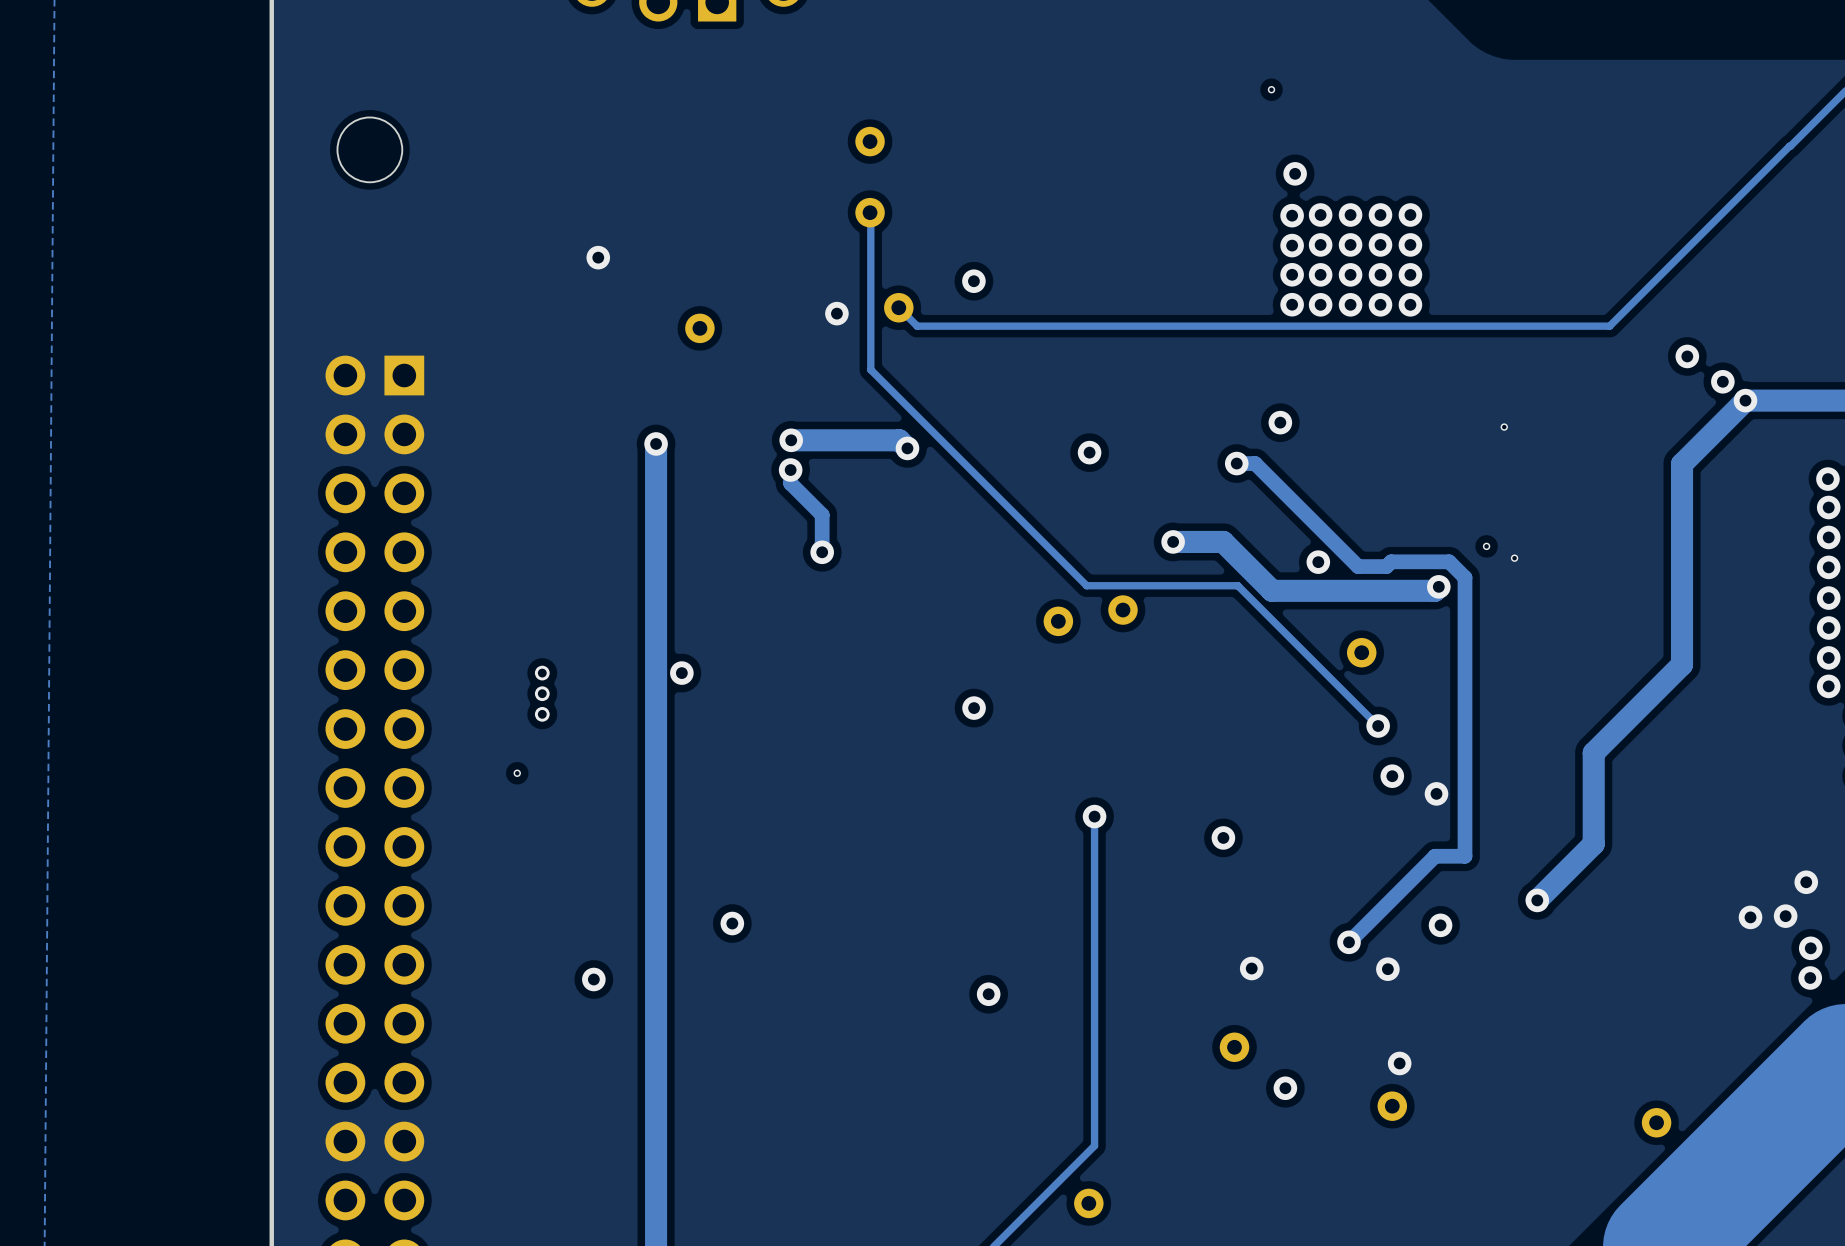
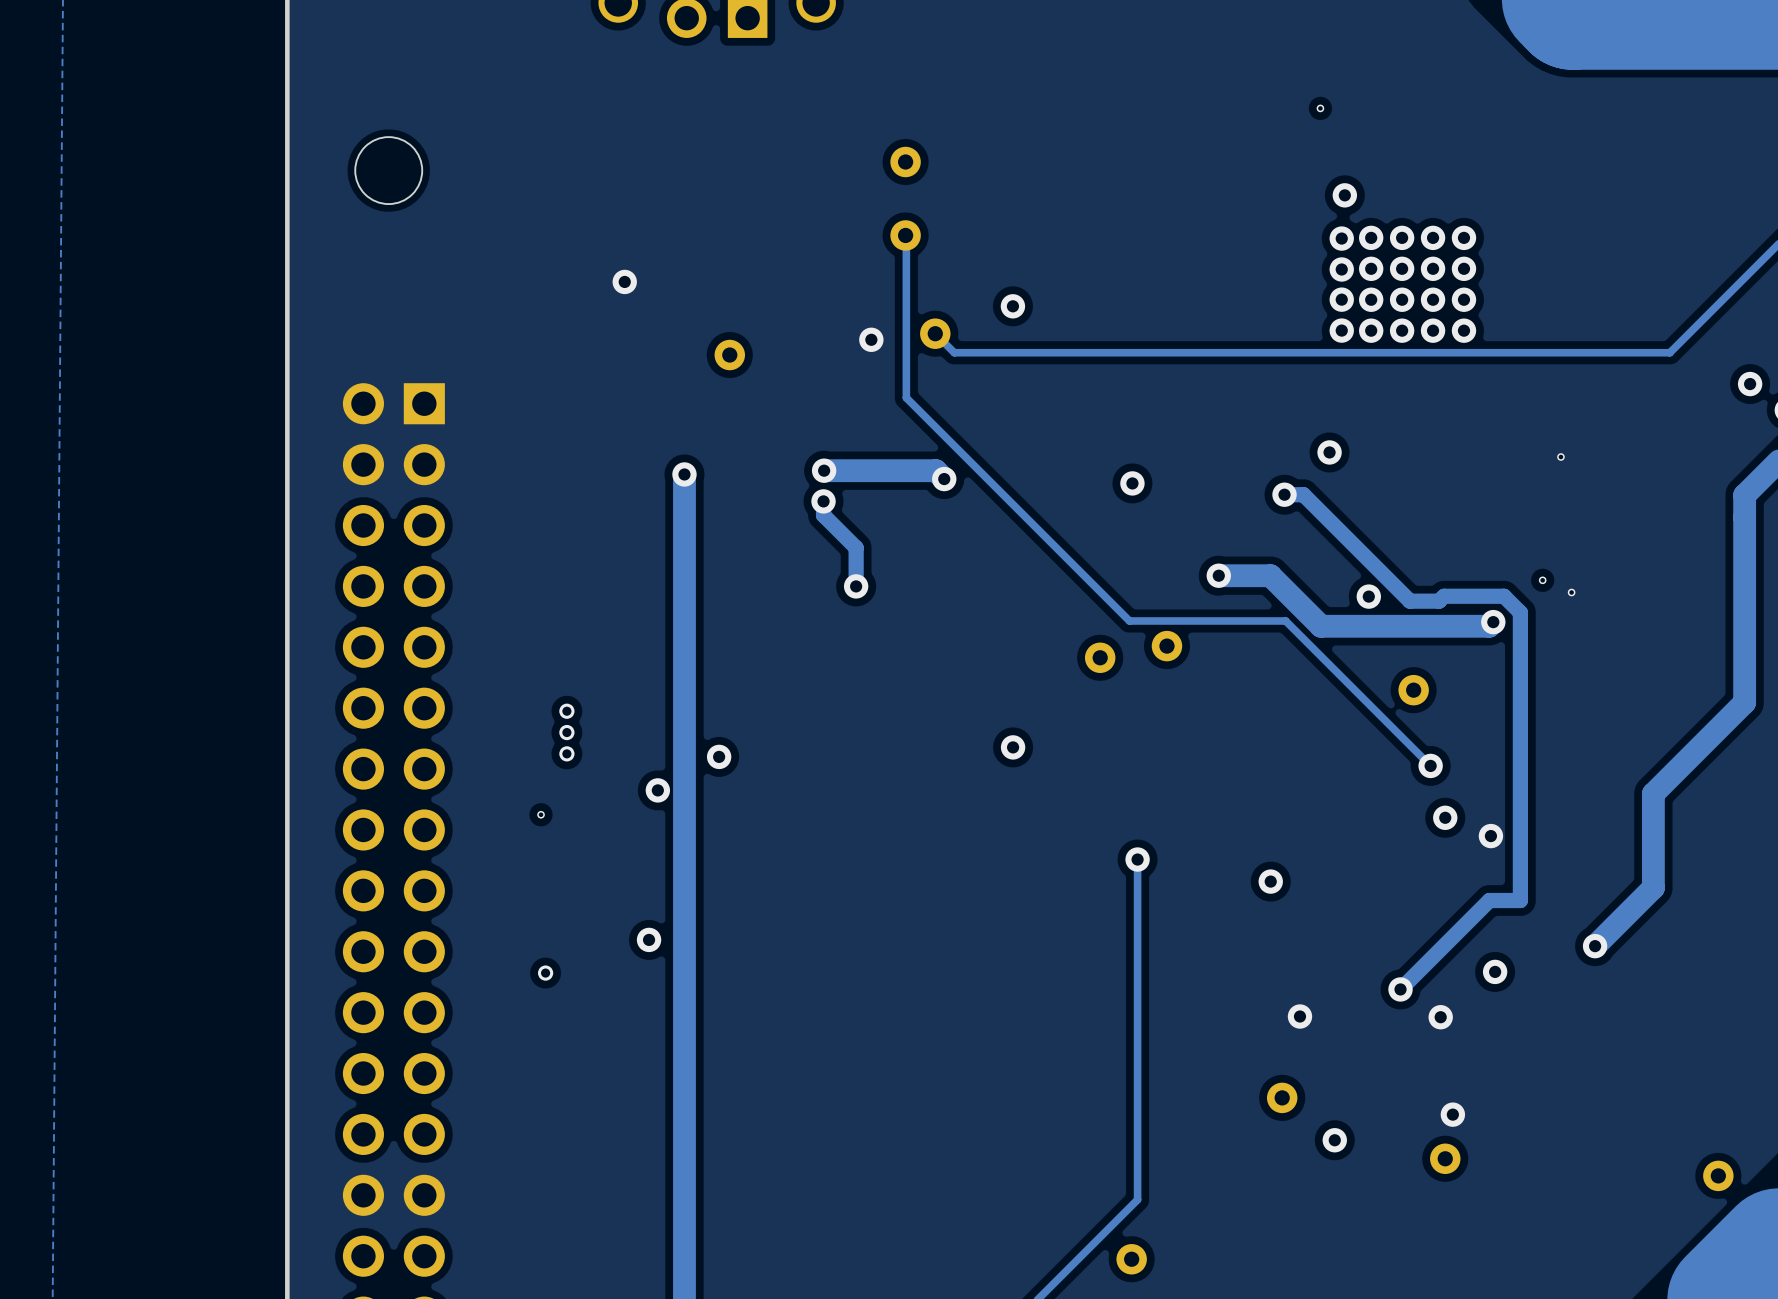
via position: (681, 673) -> (719, 756)
via: none -> (657, 790)
via: none -> (649, 939)
via: (732, 923) -> none
via: none -> (545, 973)
via: (593, 979) -> none
via: (988, 994) -> none

